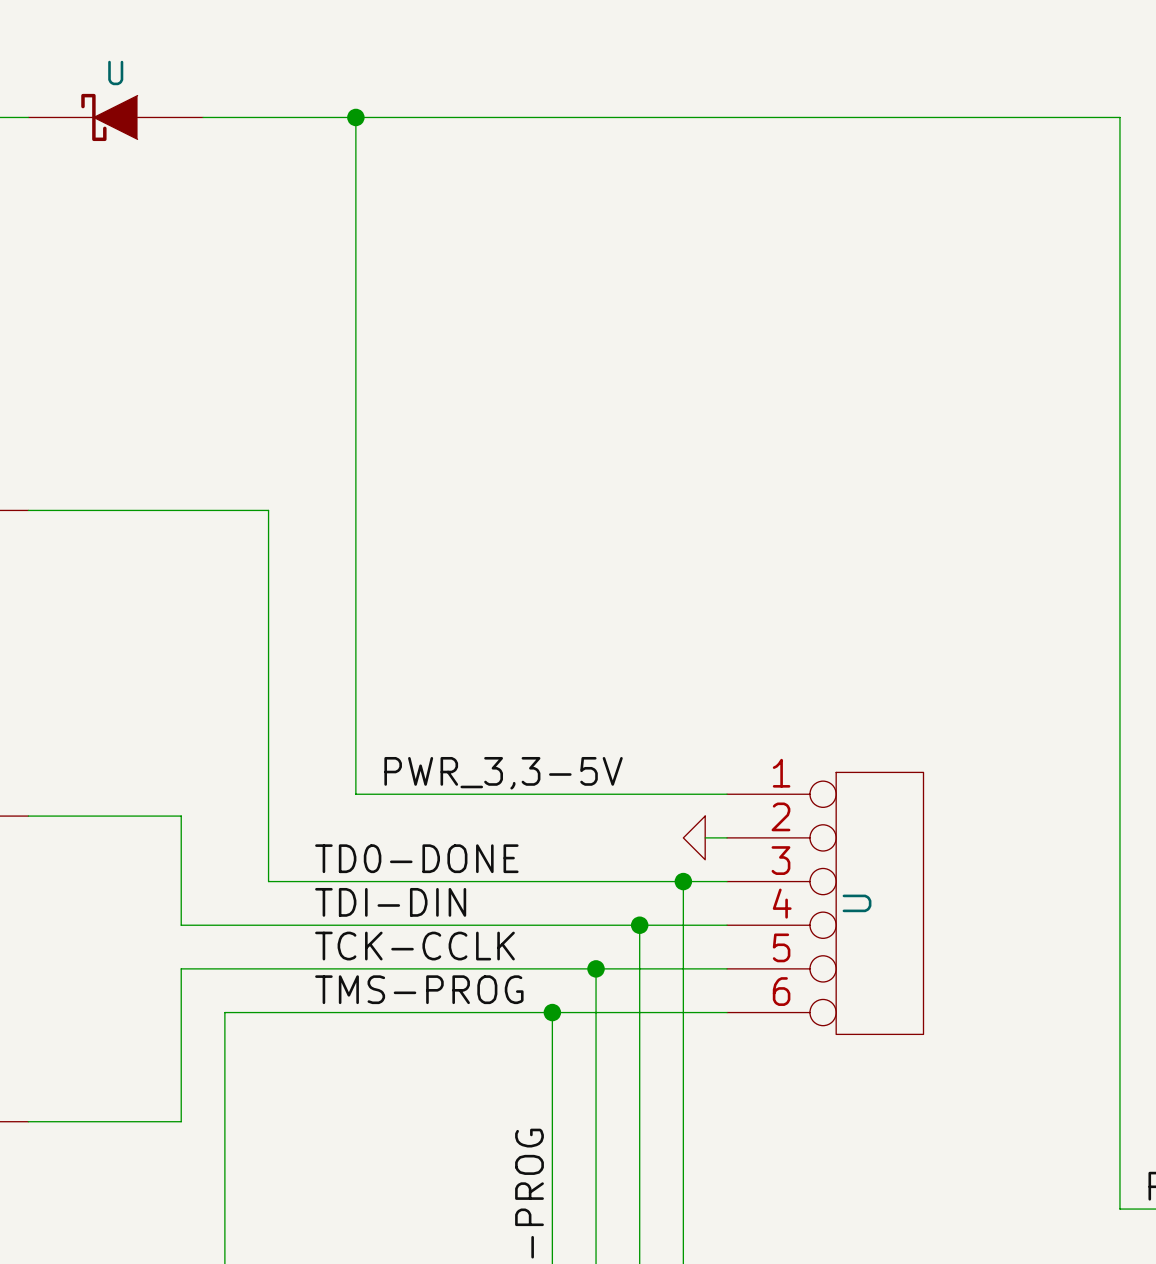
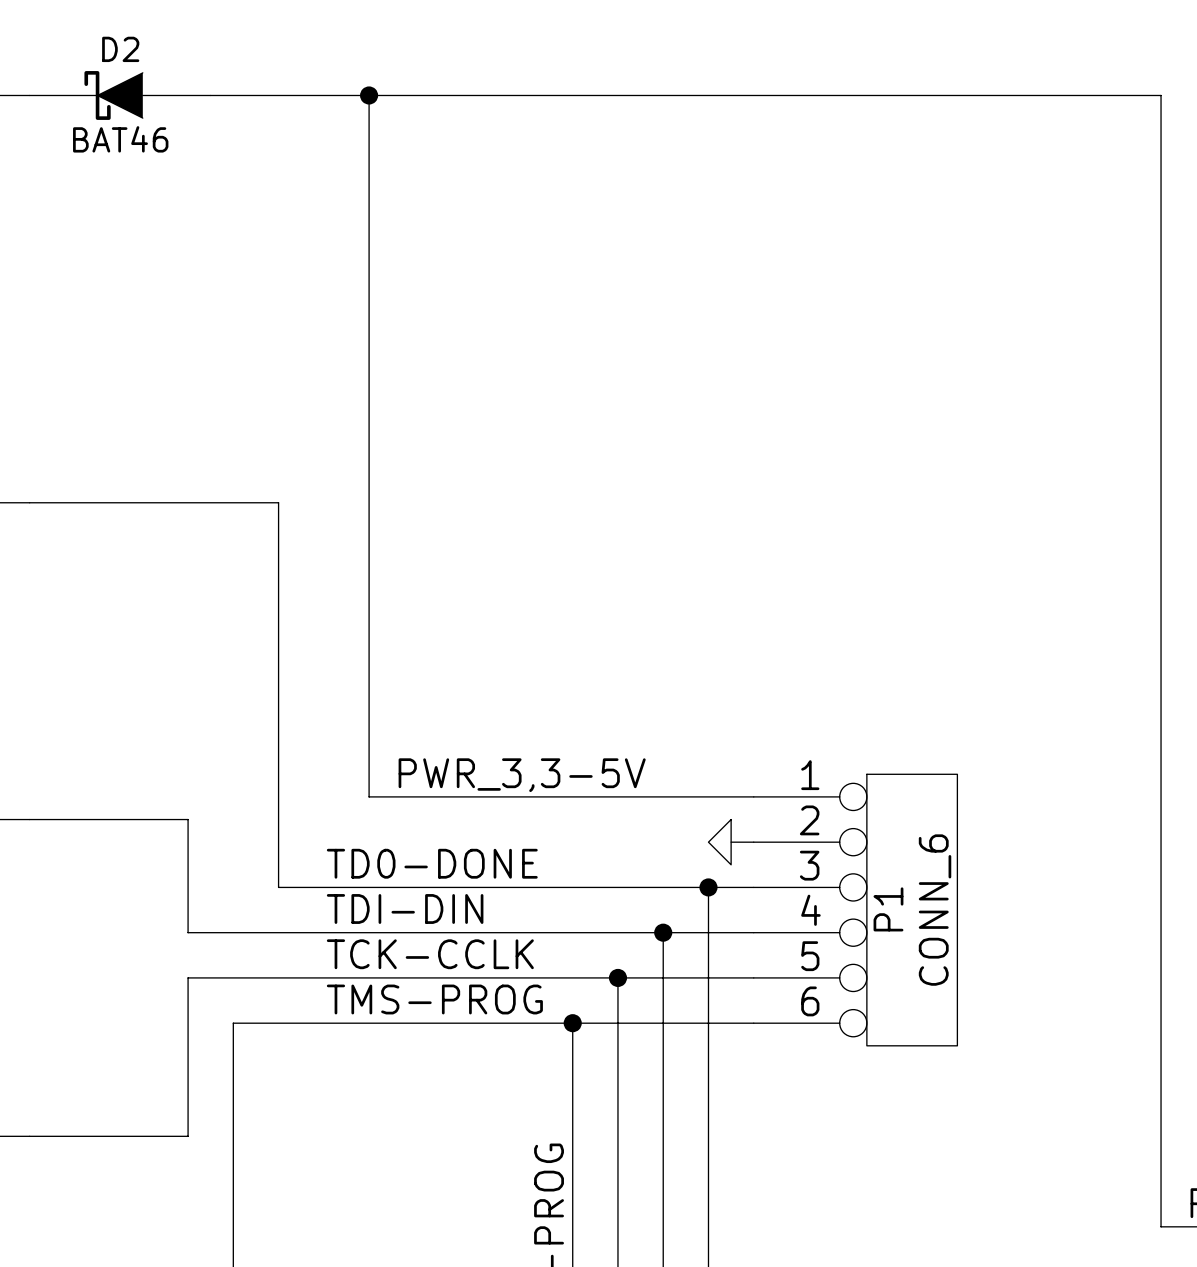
U name: U (115, 72) -> D2 (120, 49)
U value: none -> BAT46 (120, 139)
U name: U (857, 903) -> P1 (888, 909)
U value: none -> CONN_6 (935, 910)

